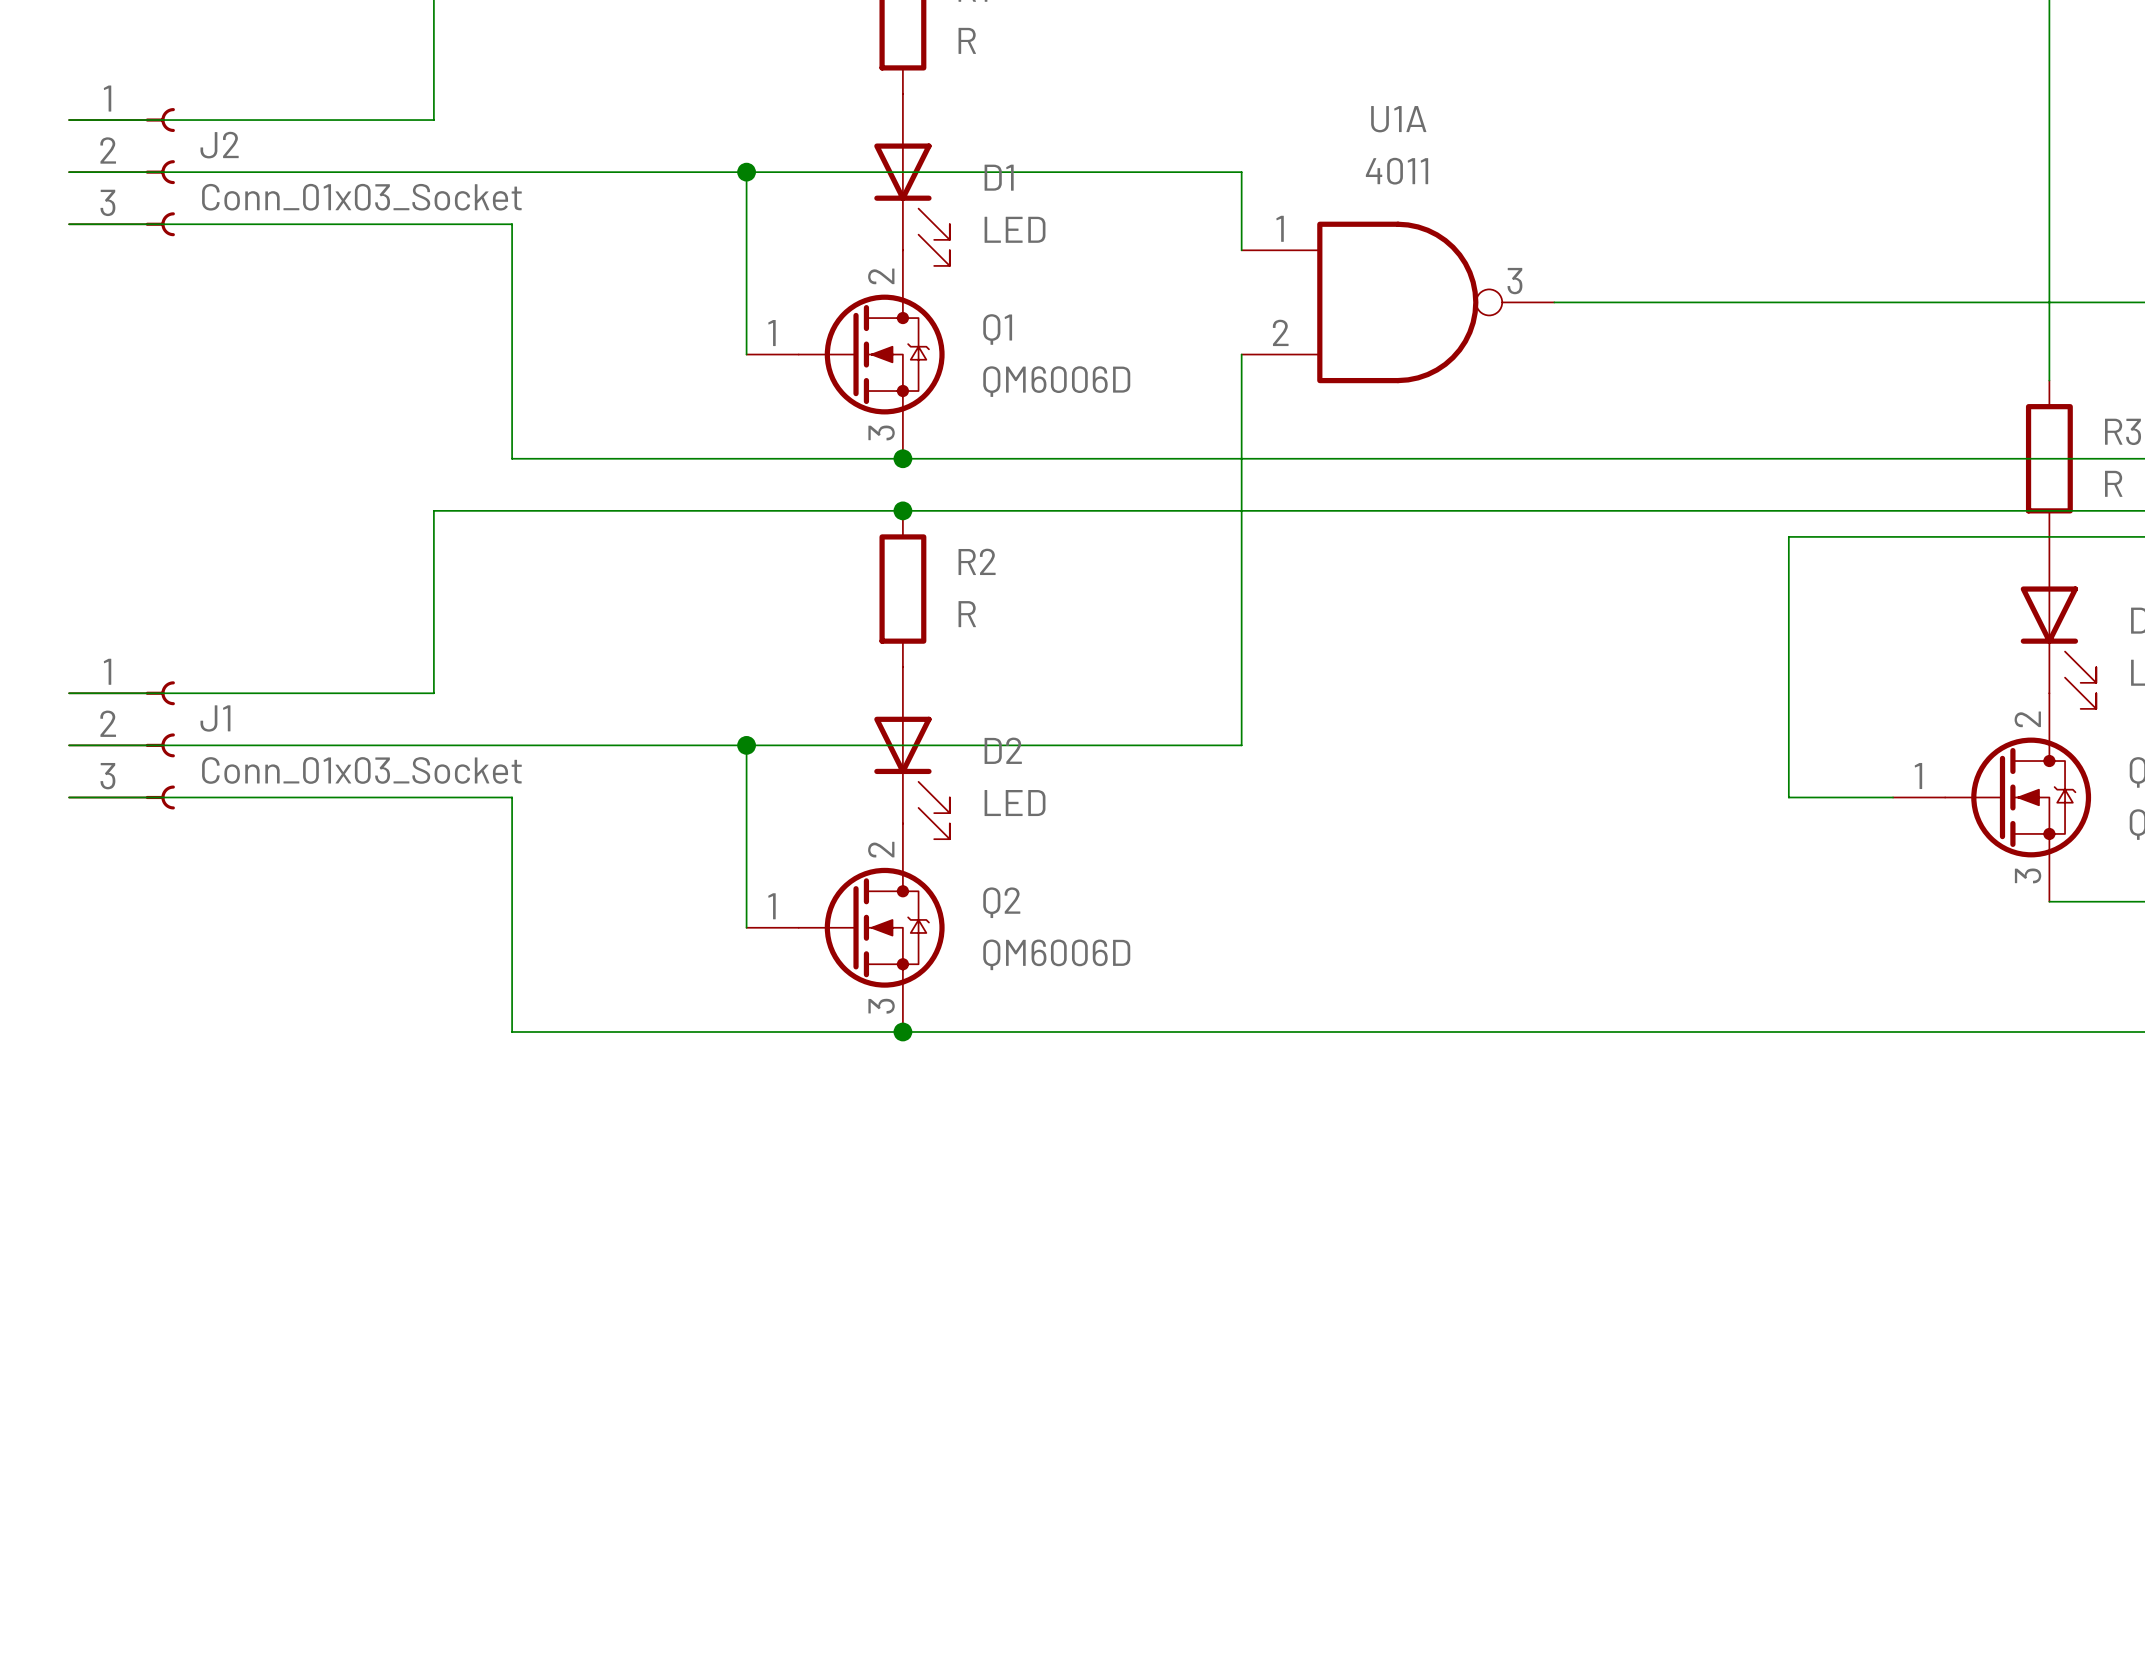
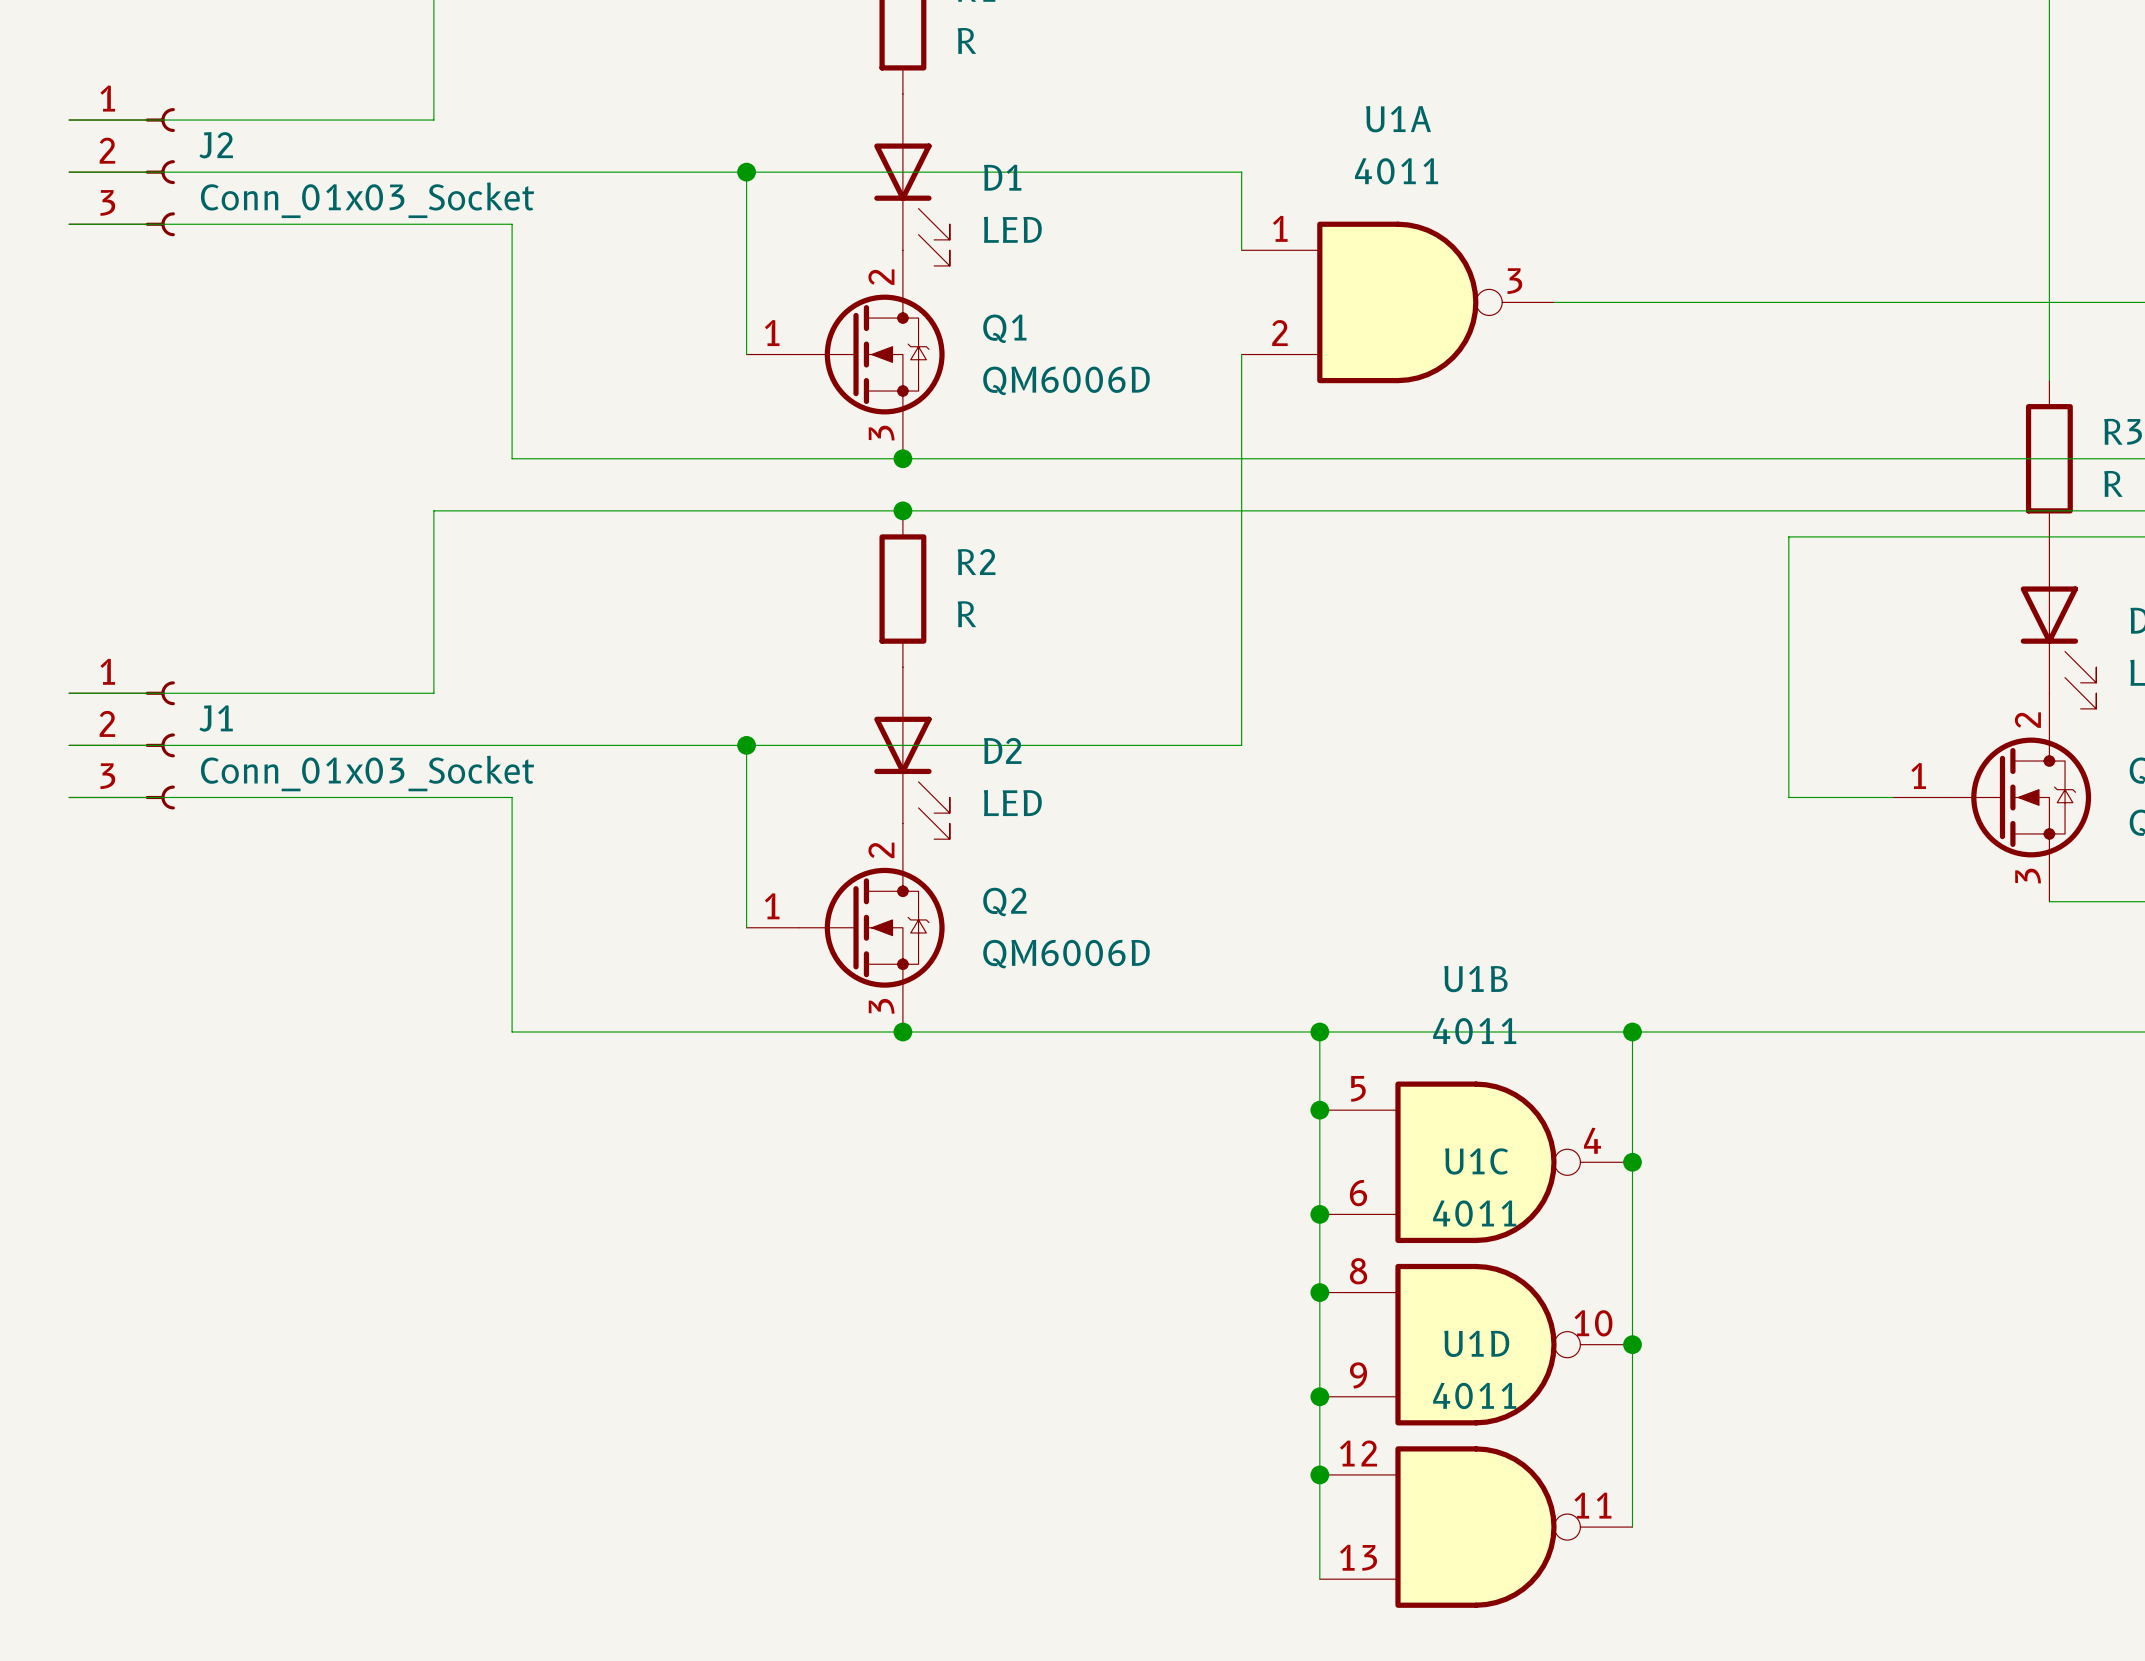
wire: none -> (1319, 1031) (1319, 1579)
junction: none -> (1319, 1031)
wire: none -> (1632, 1031) (1632, 1527)
junction: none -> (1632, 1031)
junction: none -> (1319, 1110)
U1B: none -> 4011 (1476, 1162)
junction: none -> (1632, 1162)
junction: none -> (1319, 1214)
junction: none -> (1319, 1292)
U1C: none -> 4011 (1476, 1344)
junction: none -> (1632, 1344)
junction: none -> (1319, 1396)
junction: none -> (1319, 1474)
U1D: none -> 4011 (1476, 1527)

